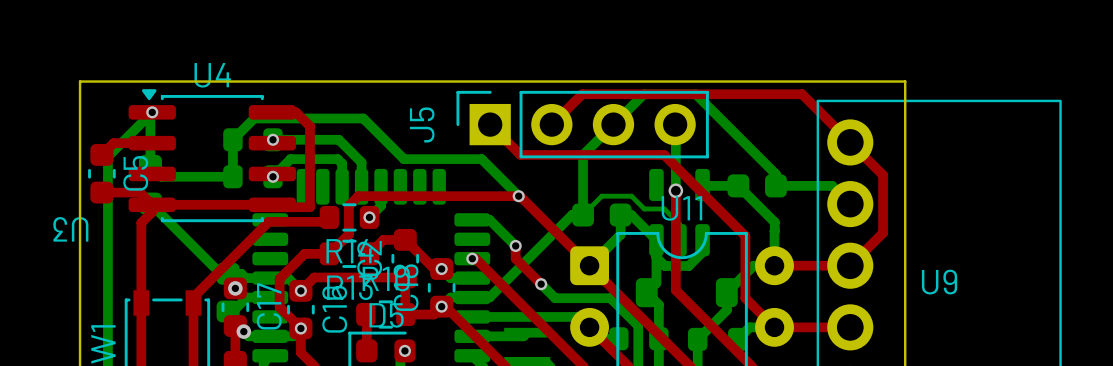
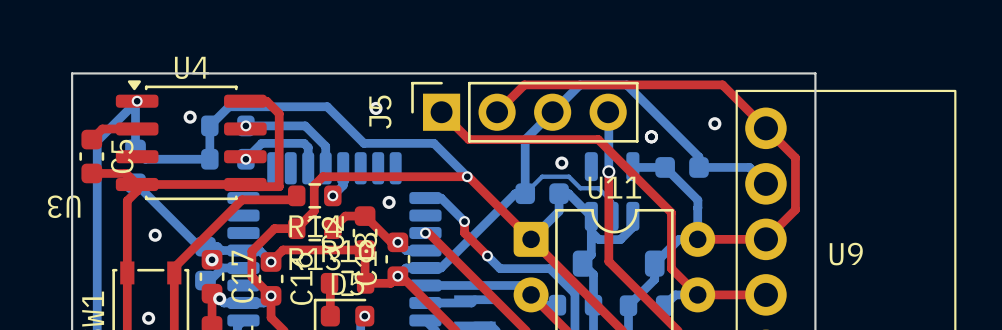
via: none -> (375, 108)
via: none -> (190, 117)
via: none -> (714, 123)
via: none -> (651, 136)
via: none -> (561, 163)
via: none -> (389, 202)
via: none -> (155, 235)
via: none -> (148, 318)

